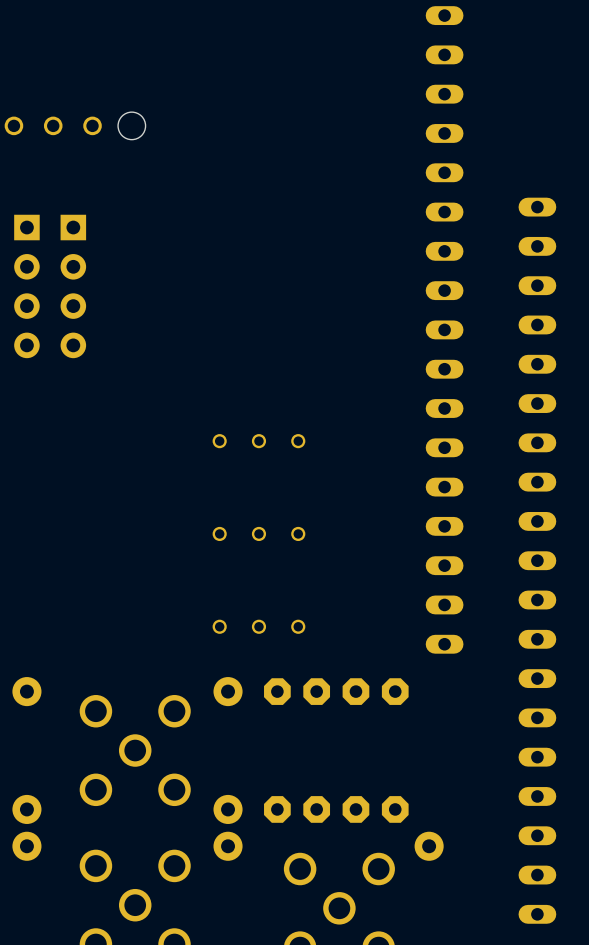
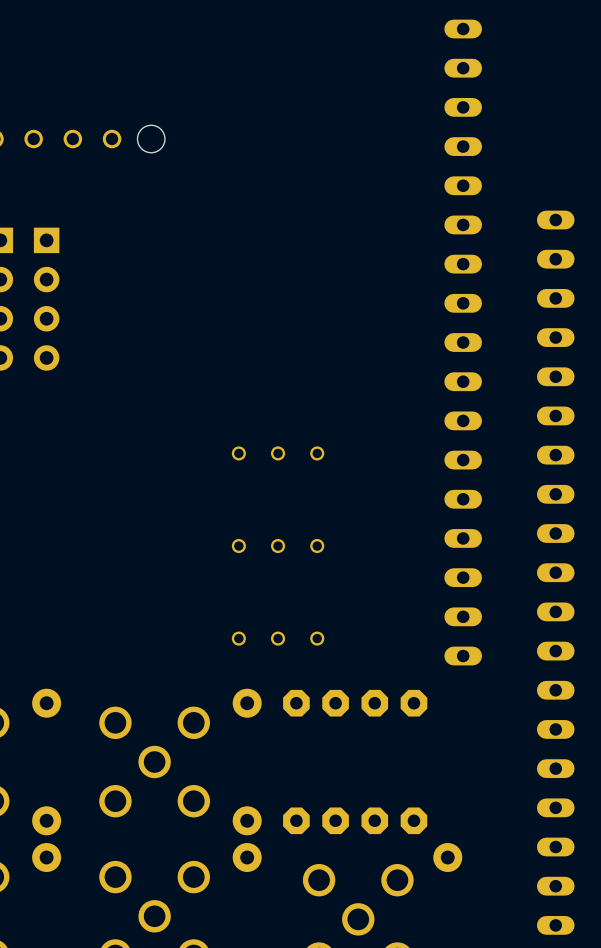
part: (73, 286) -> none

